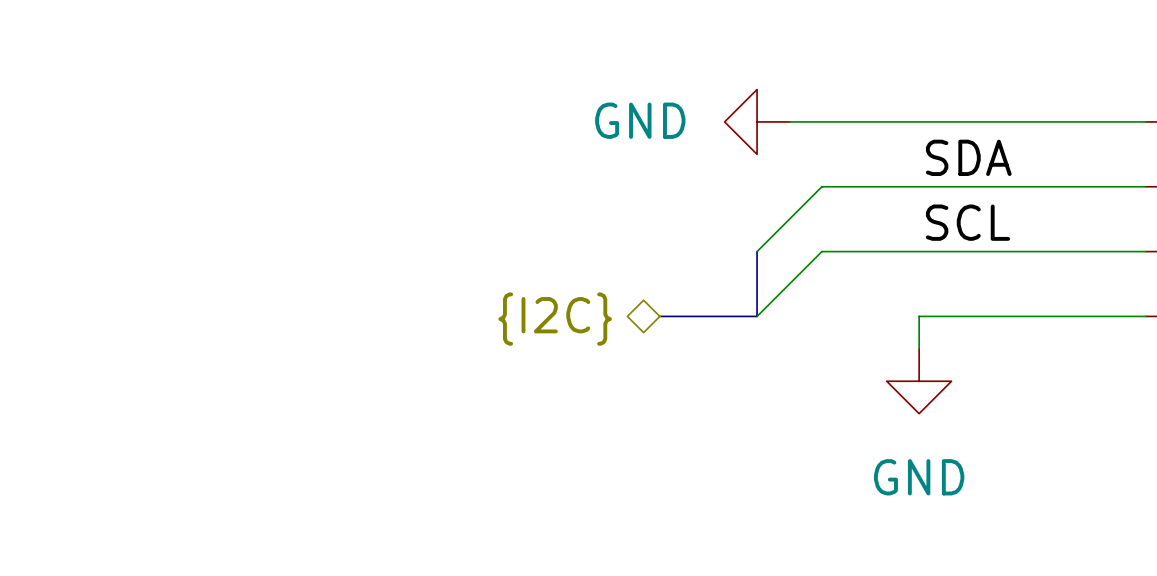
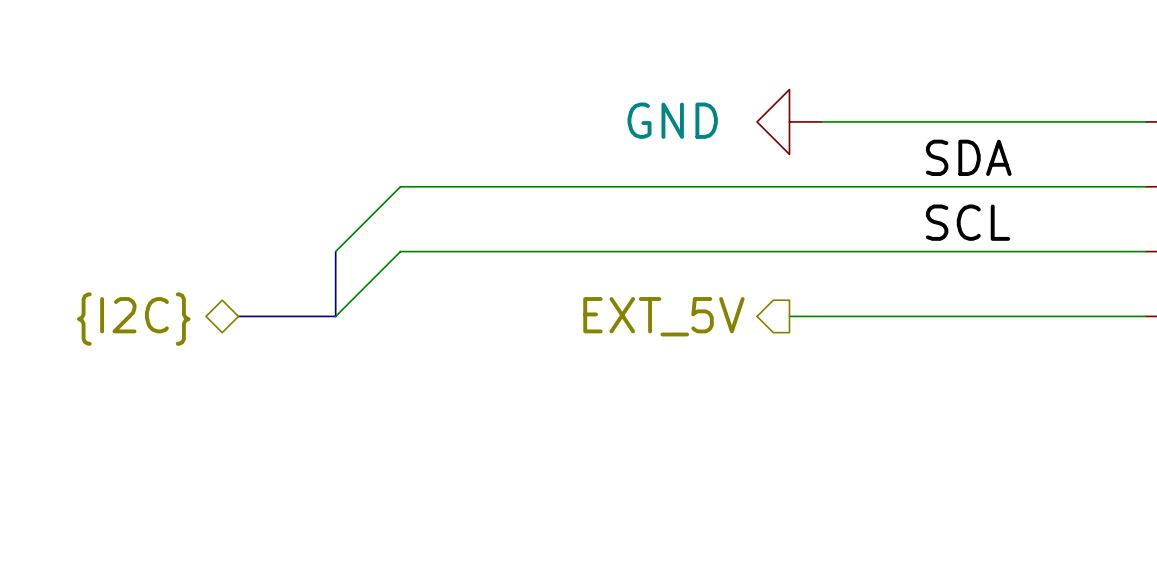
power symbol position: GND (757, 121) -> GND (789, 121)
wire: (821, 186) (757, 251) -> (821, 186) (400, 186) (335, 251)
bus: (757, 251) (757, 316) (659, 316) -> (335, 251) (335, 316) (238, 316)
wire: (821, 251) (757, 316) -> (821, 251) (400, 251) (335, 316)
hierarchical label: none -> EXT_5V (663, 316)
wire: (919, 316) (919, 348) -> (919, 316) (789, 316)
hierarchical label position: {I2C} (555, 319) -> {I2C} (133, 319)
power symbol: GND (919, 381) -> none

